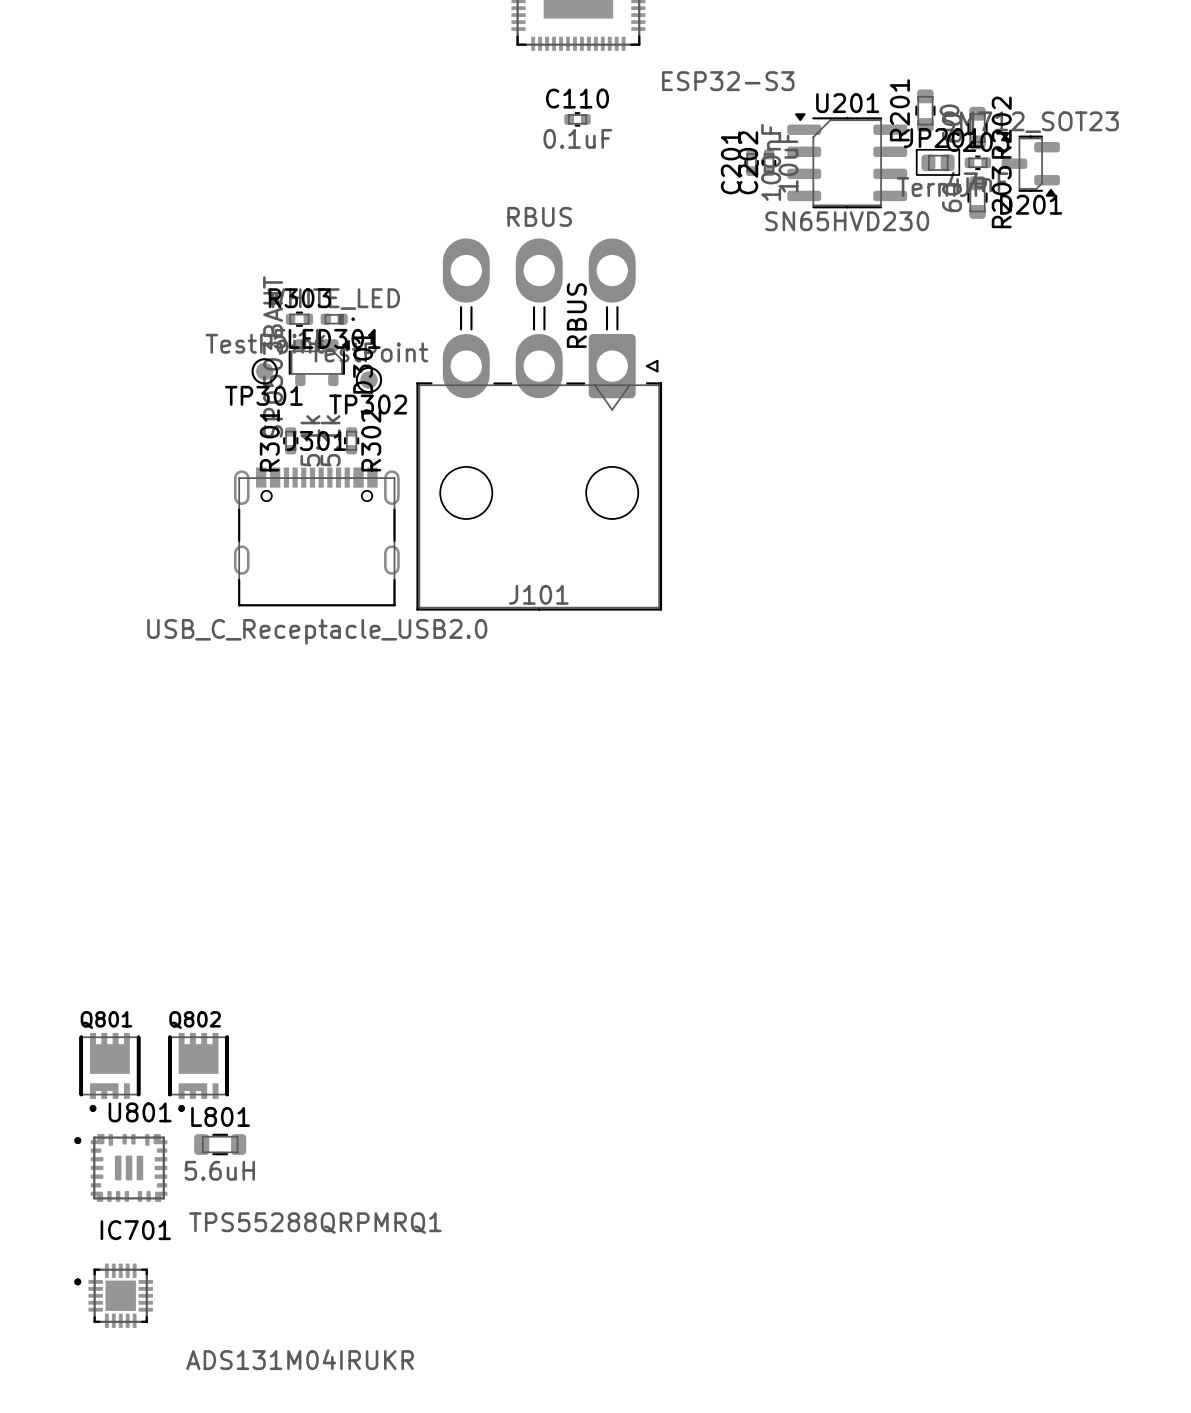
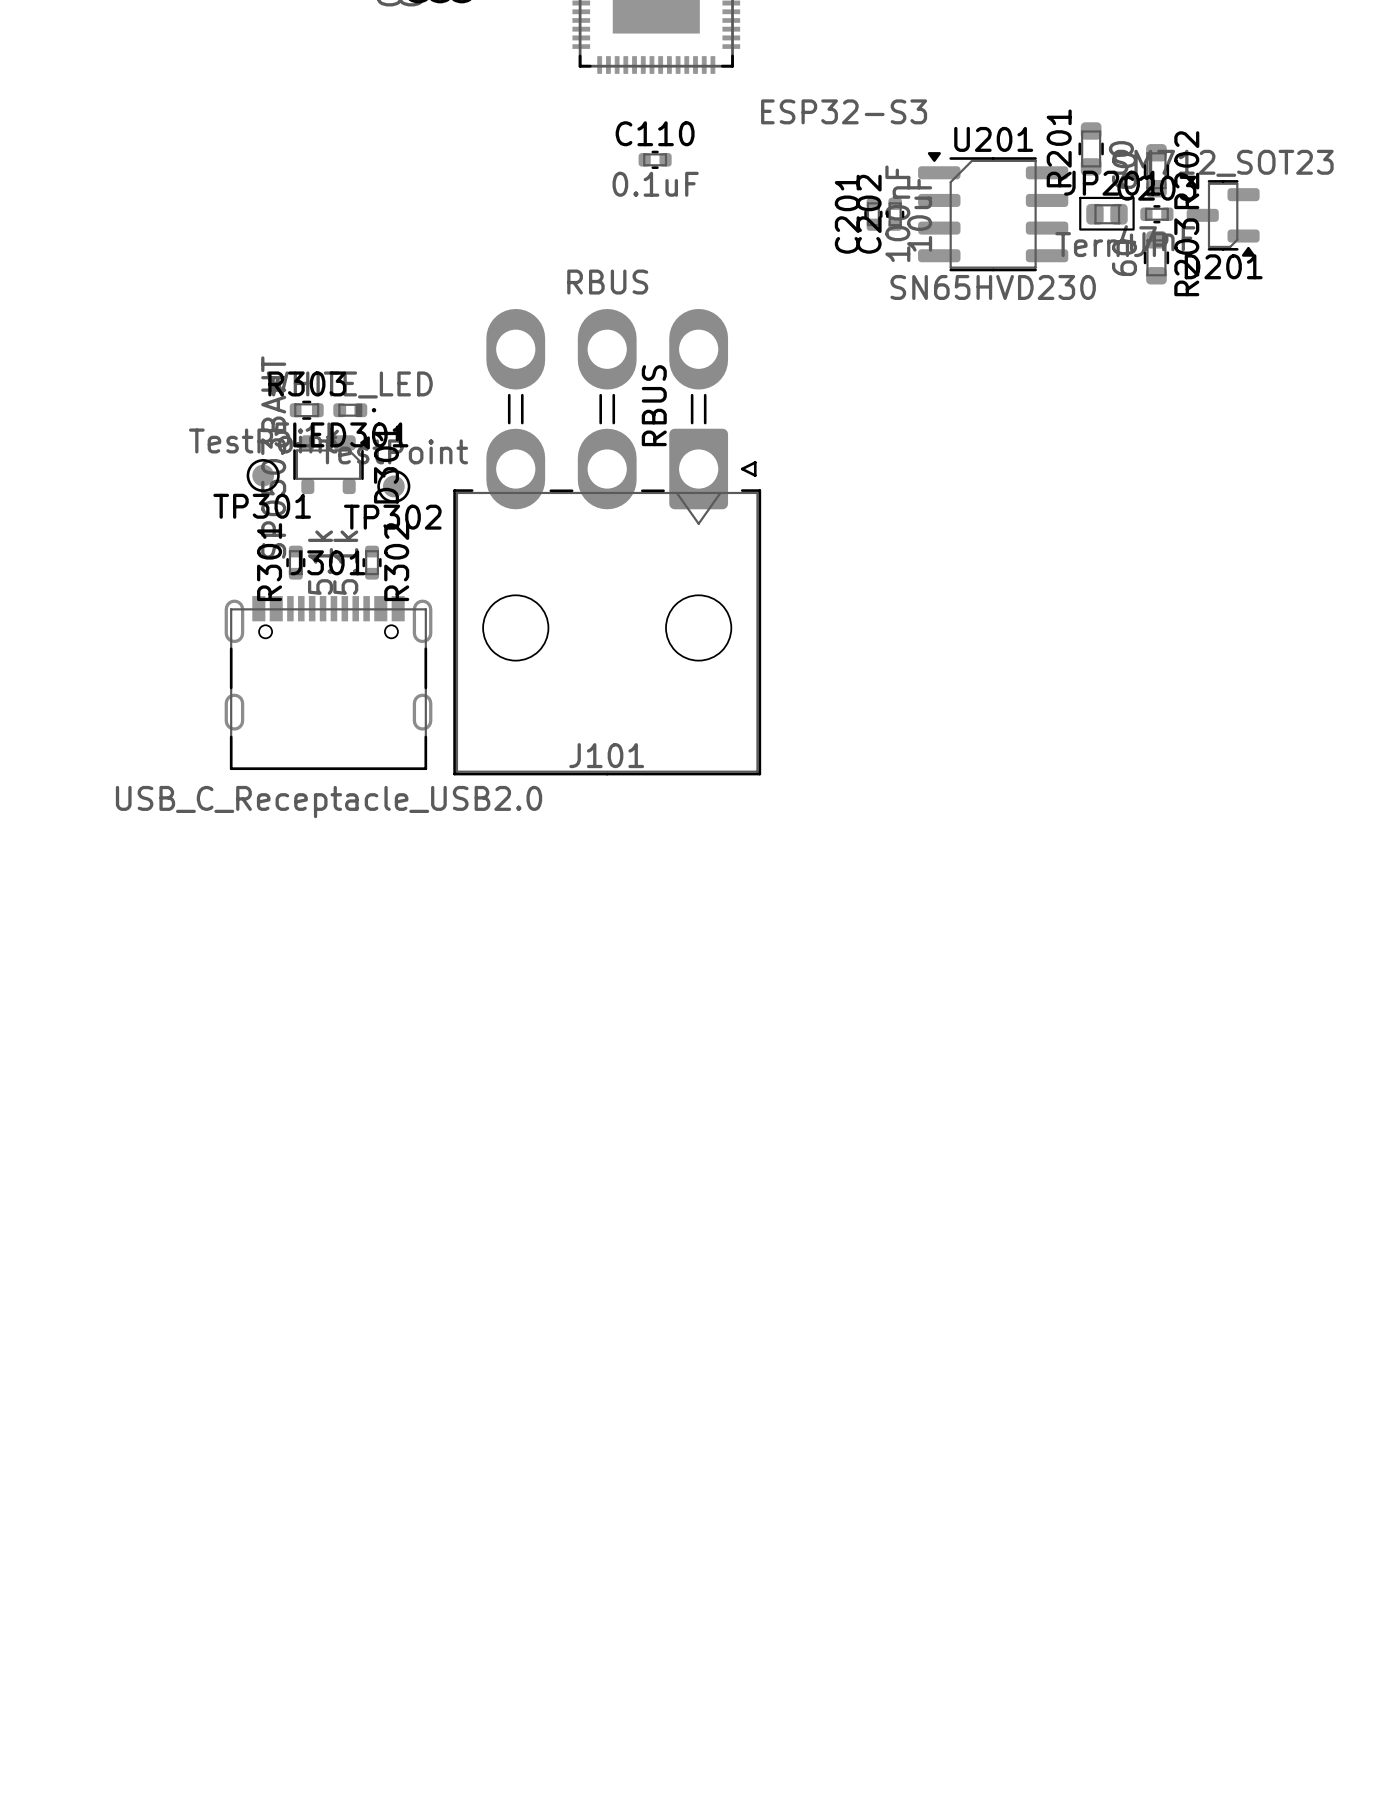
Q801: (109, 1072) -> none
Q802: (198, 1072) -> none
L801: 5.6uH (220, 1144) -> none
U801: TPS55288QRPMRQ1 (120, 1167) -> none
IC701: ADS131M04IRUKR (113, 1295) -> none

